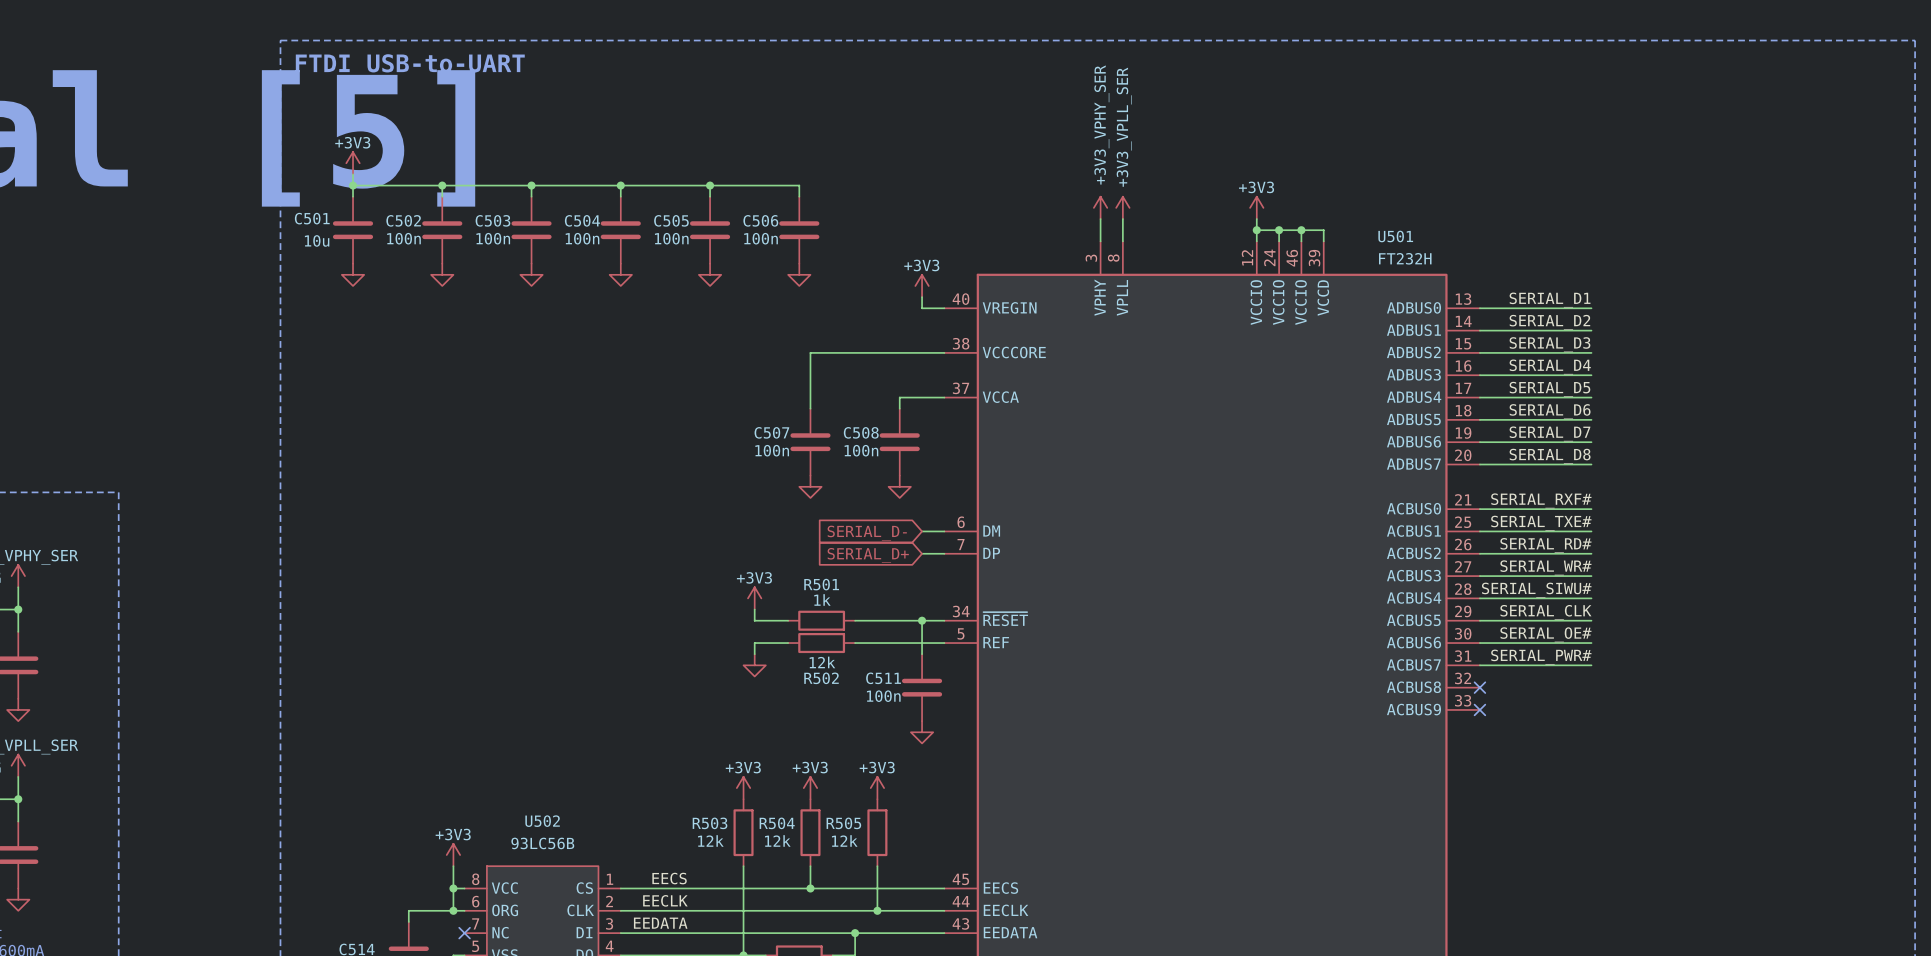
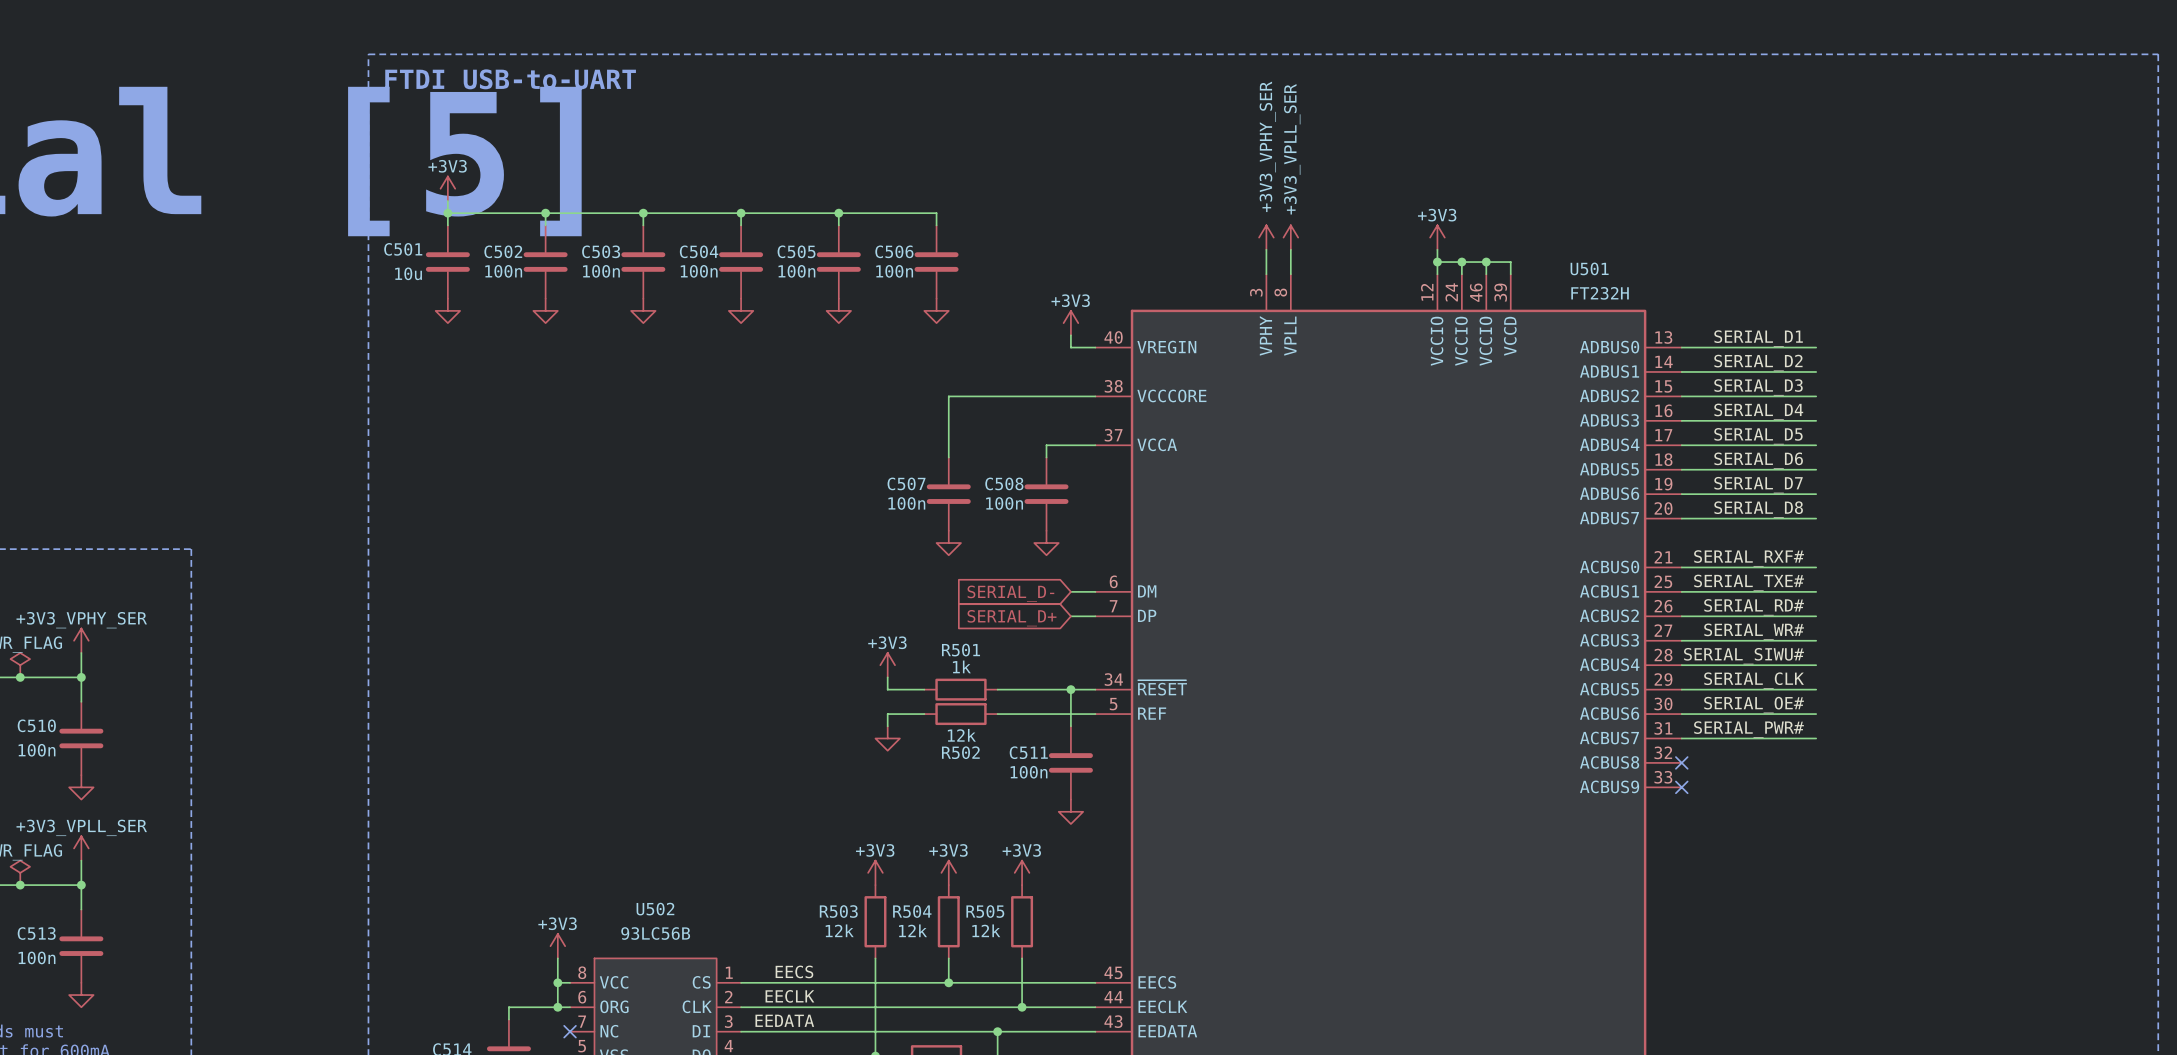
wire: none -> (1803, 347) (1816, 347)
wire: none -> (1803, 371) (1816, 371)
wire: none -> (1803, 396) (1816, 396)
wire: none -> (1803, 420) (1816, 420)
wire: none -> (1803, 445) (1816, 445)
wire: none -> (1803, 469) (1816, 469)
wire: none -> (1803, 494) (1816, 494)
wire: none -> (1803, 518) (1816, 518)
wire: none -> (1803, 567) (1816, 567)
wire: none -> (1803, 591) (1816, 591)
wire: none -> (1803, 616) (1816, 616)
wire: none -> (1803, 640) (1816, 640)
wire: none -> (1803, 665) (1816, 665)
wire: none -> (1803, 689) (1816, 689)
wire: none -> (1803, 714) (1816, 714)
wire: none -> (1803, 738) (1816, 738)

